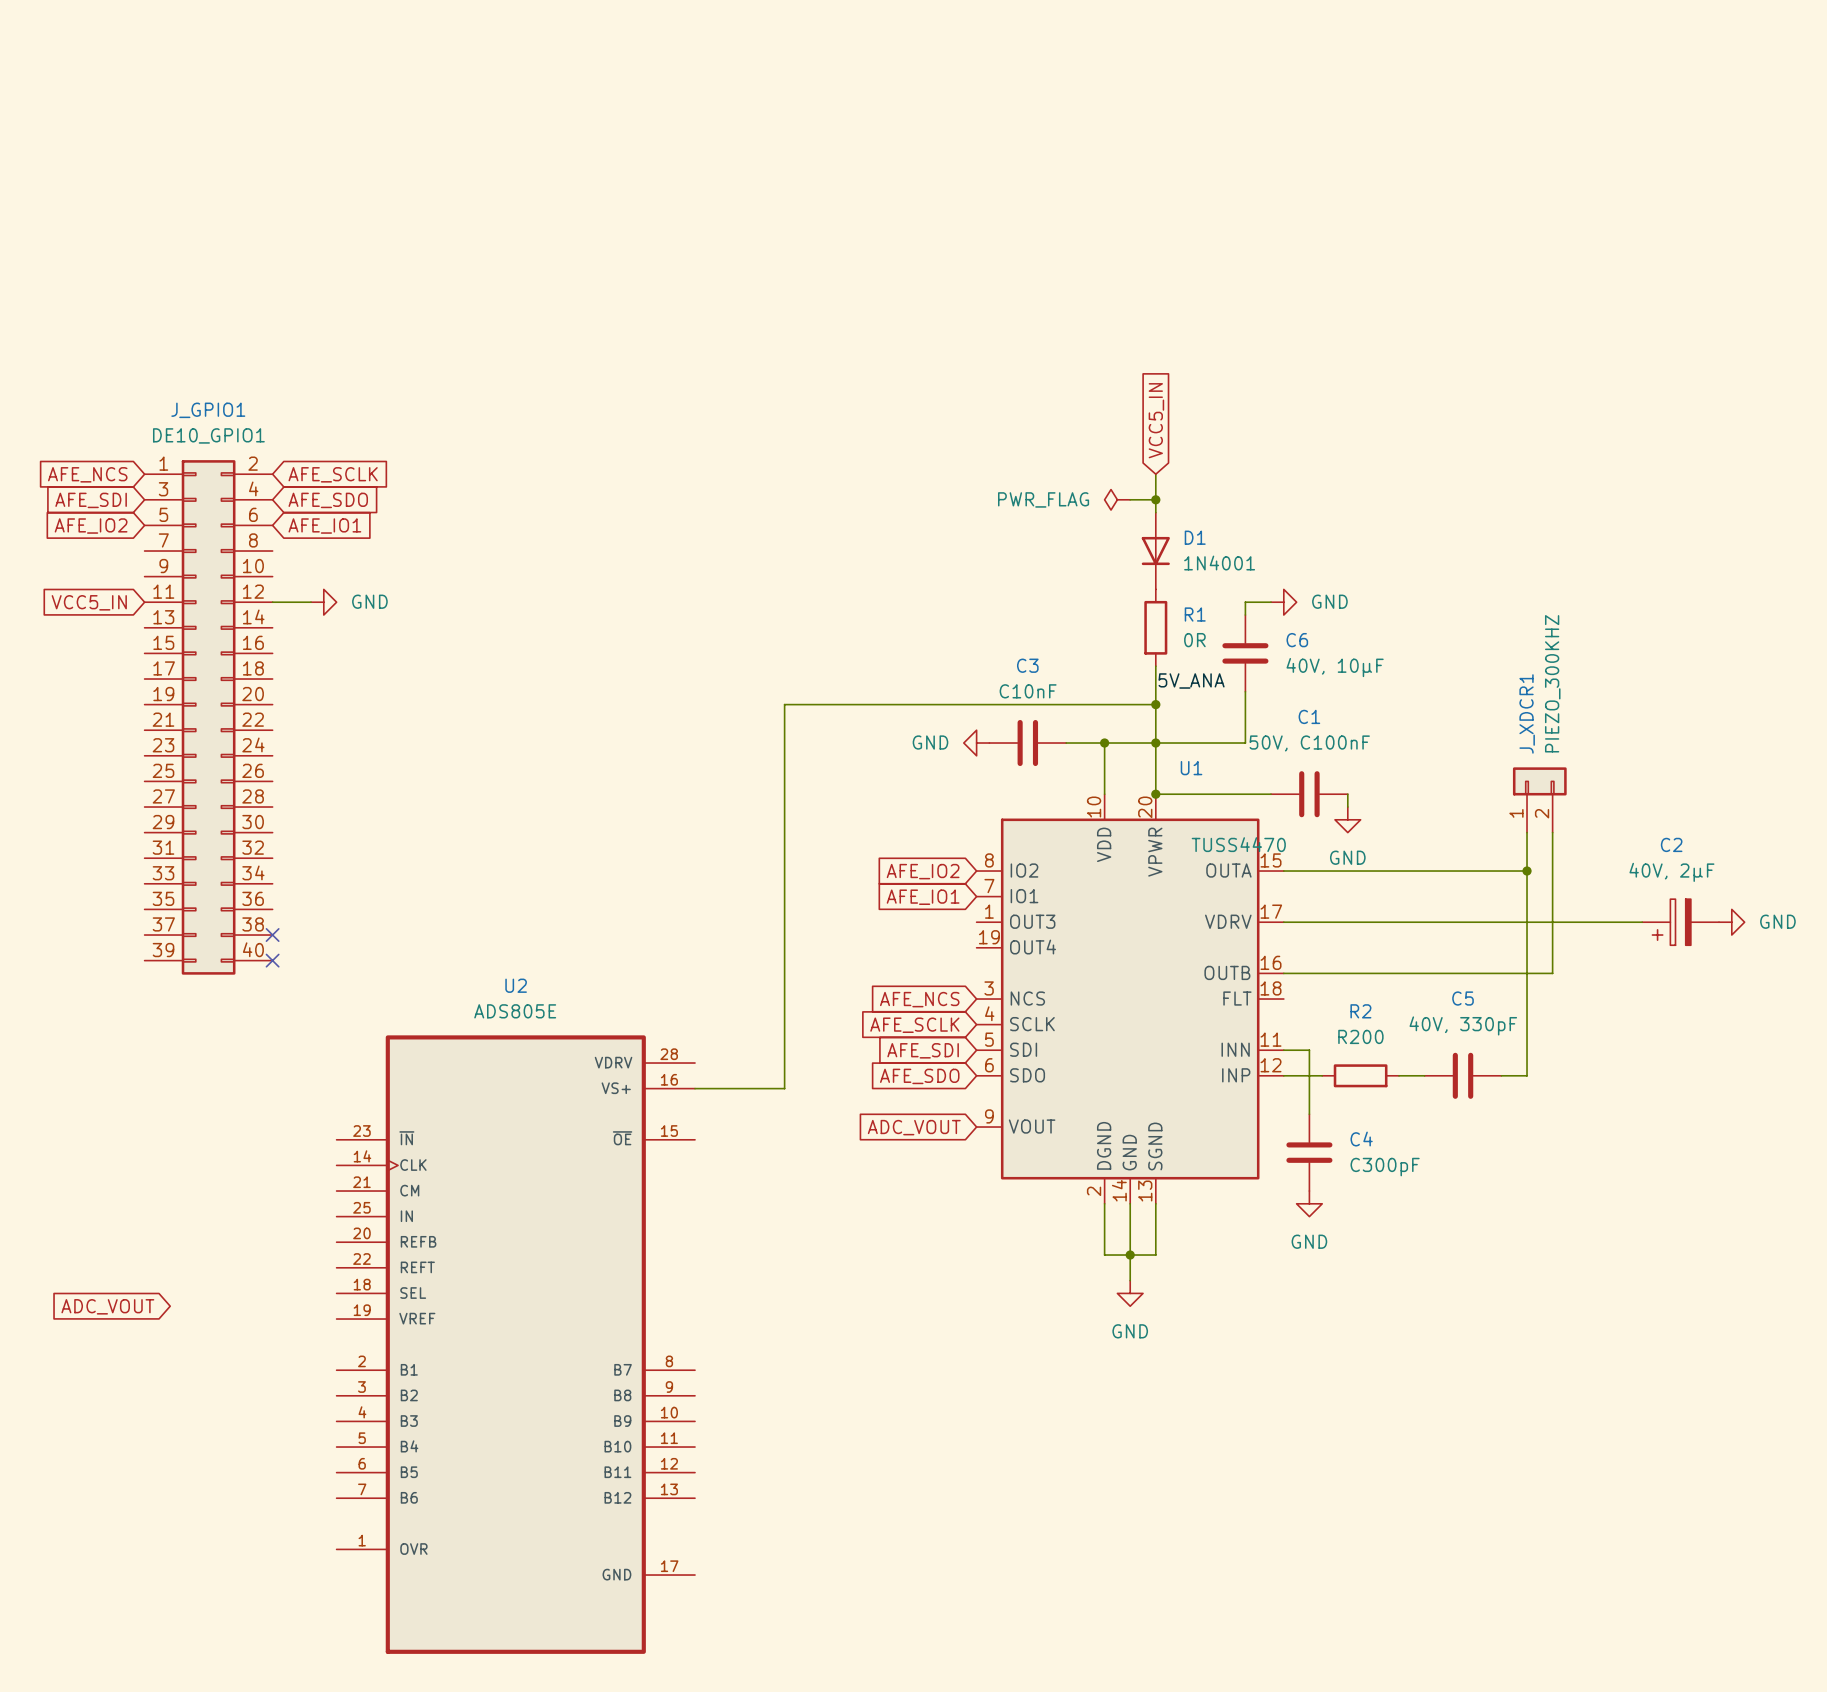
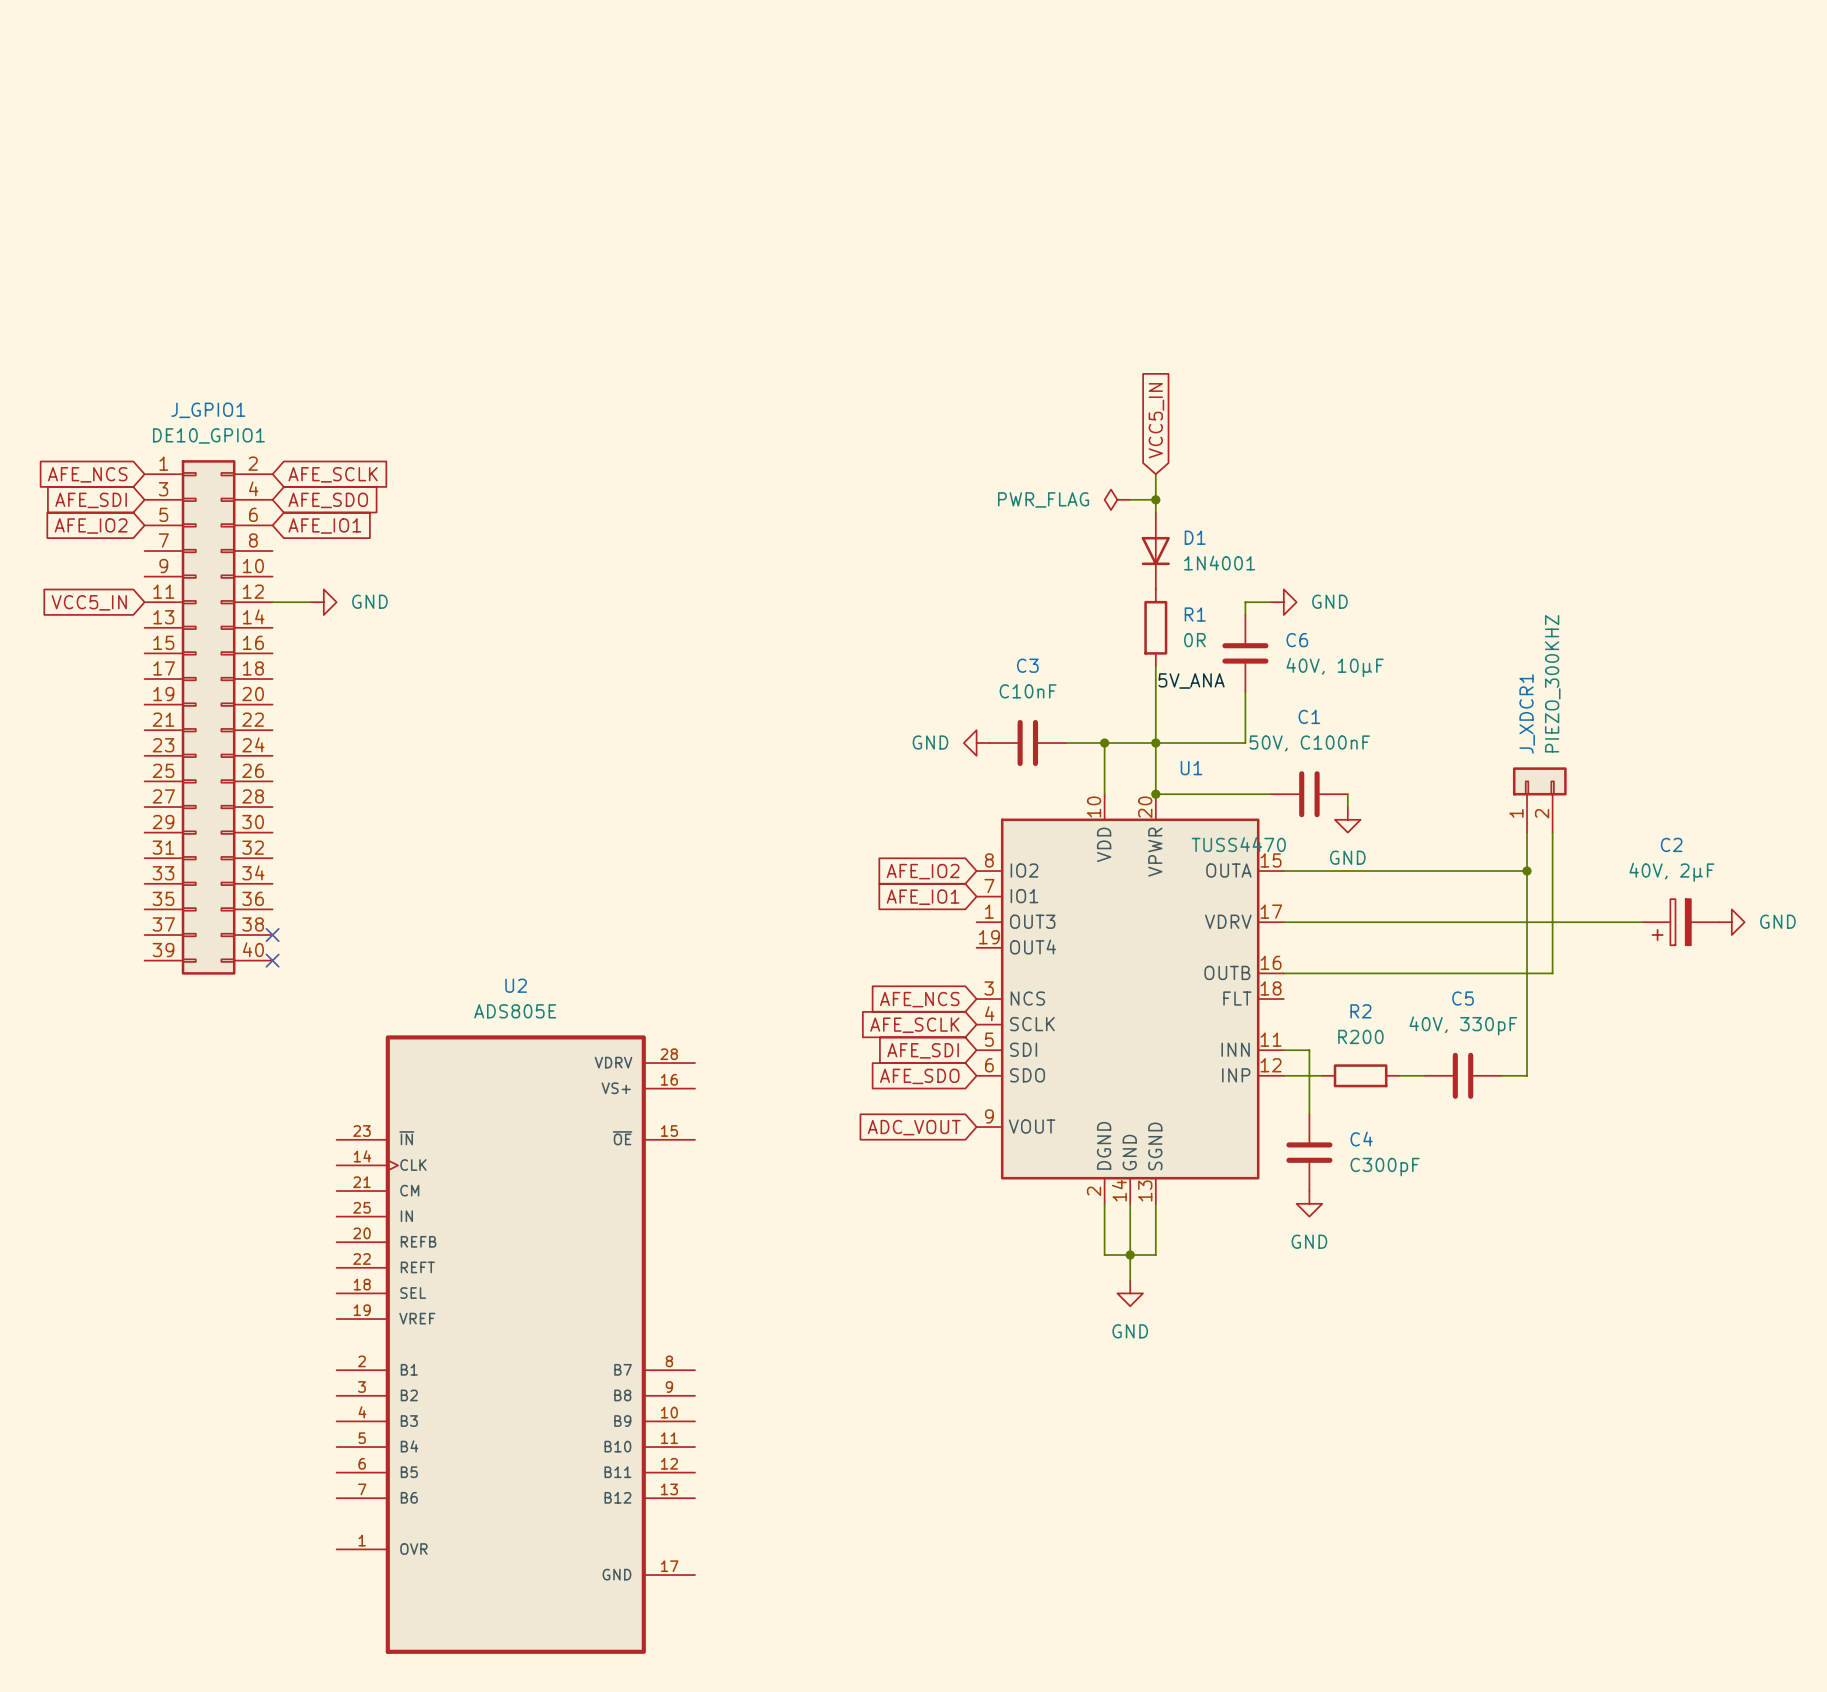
wire: (1155, 704) (784, 704) (784, 1088) (695, 1088) -> none
junction: (1155, 704) -> none
global label: ADC_VOUT (107, 1306) -> none

